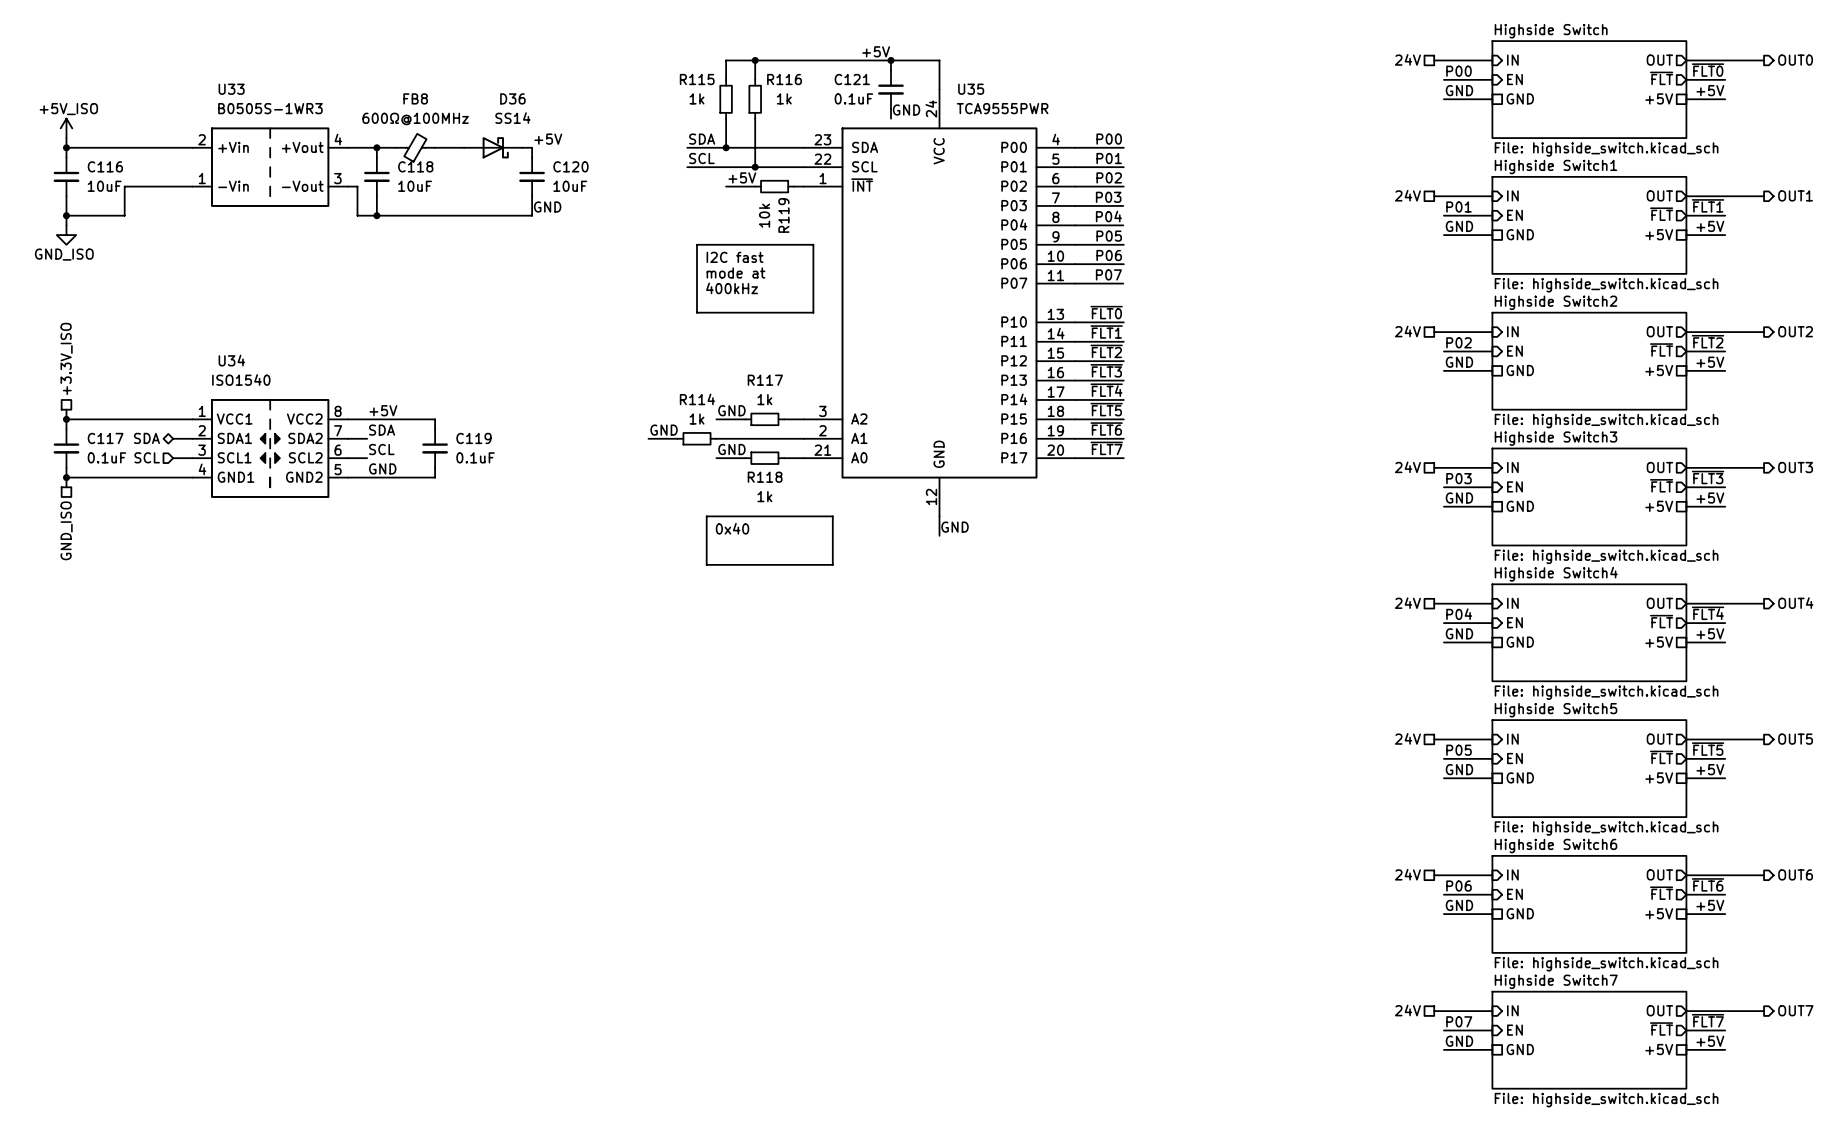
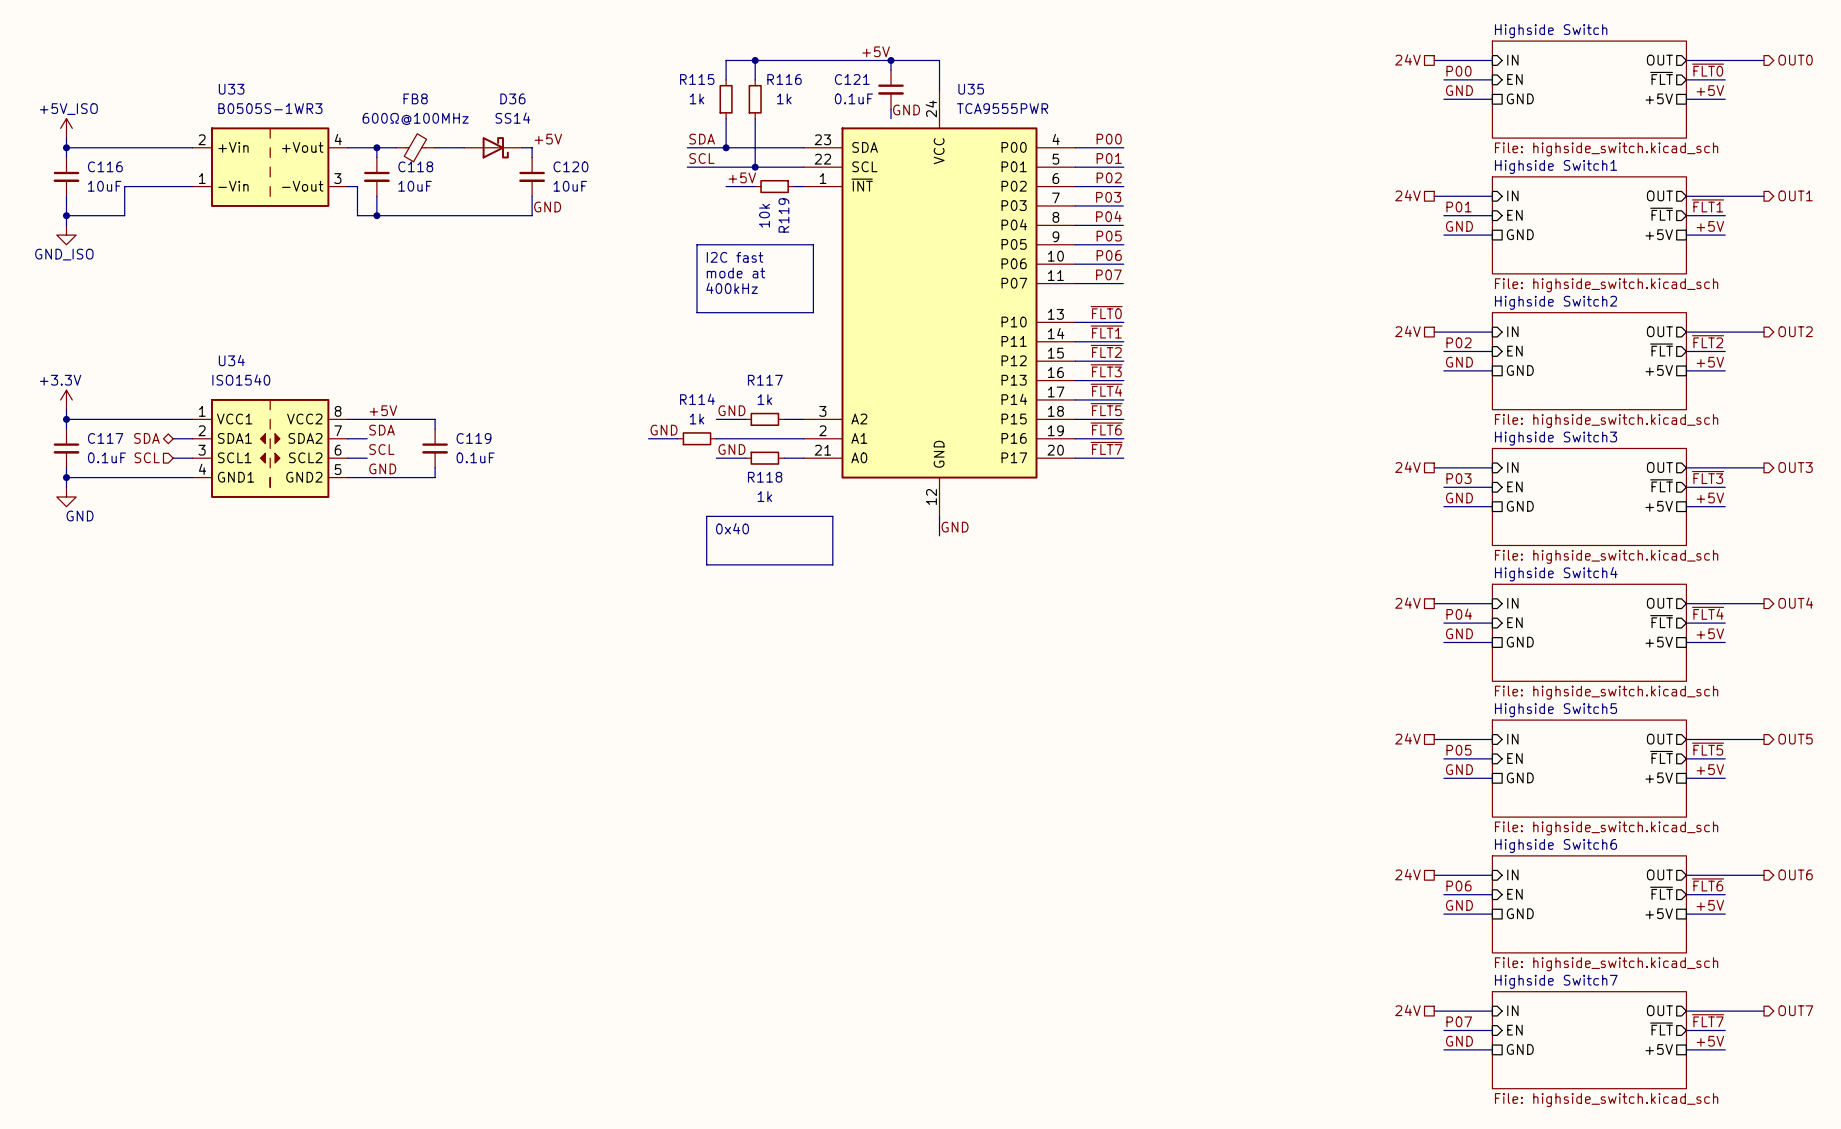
hierarchical label: +3.3V_ISO (66, 358) -> none
power symbol: none -> +3.3V (66, 399)
power symbol: none -> GND (66, 496)
hierarchical label: GND_ISO (66, 530) -> none

